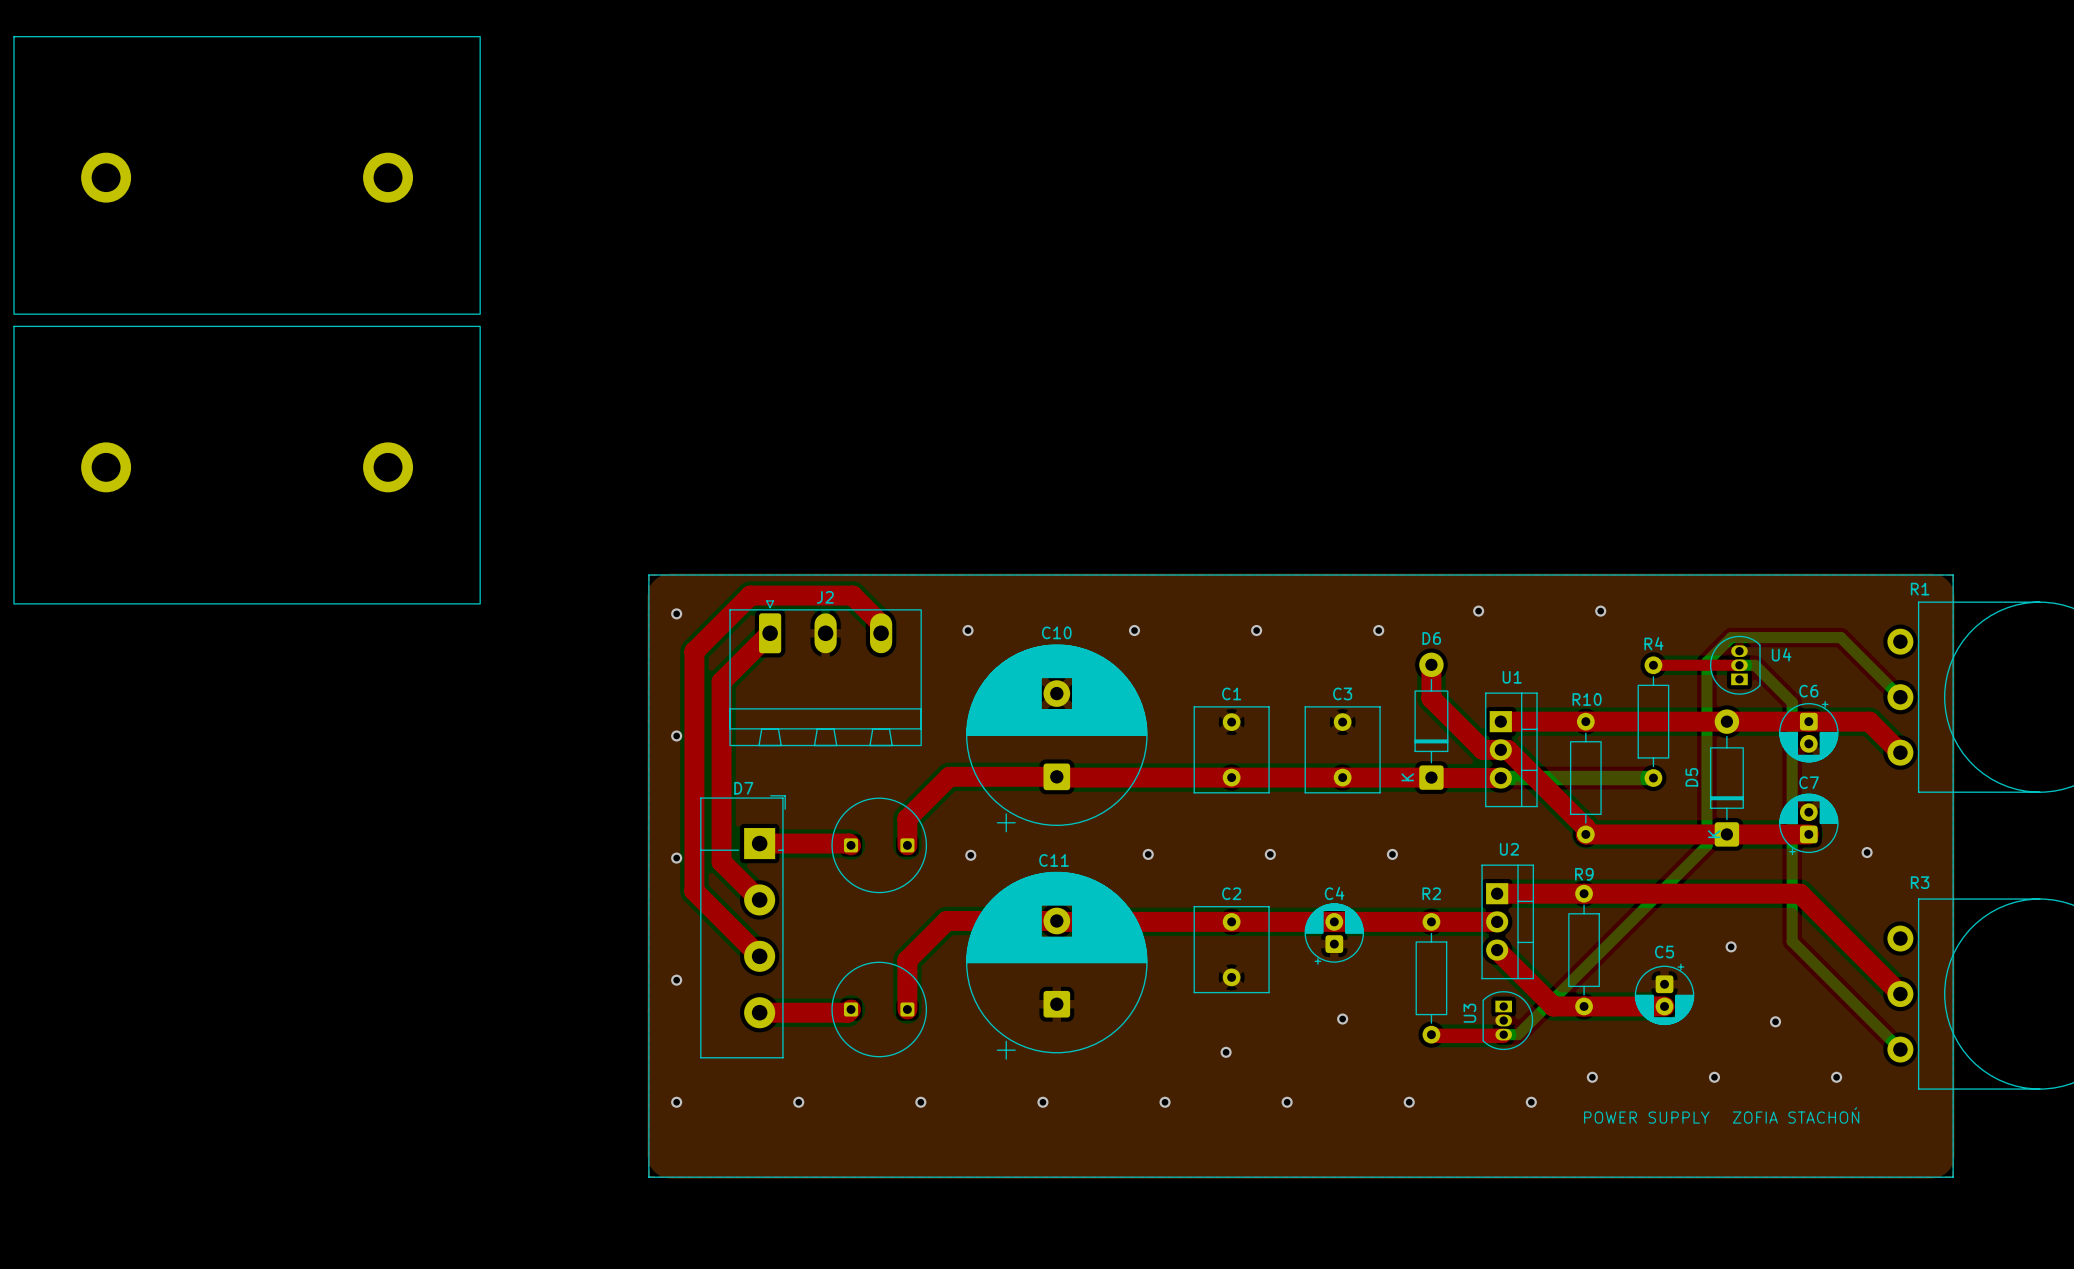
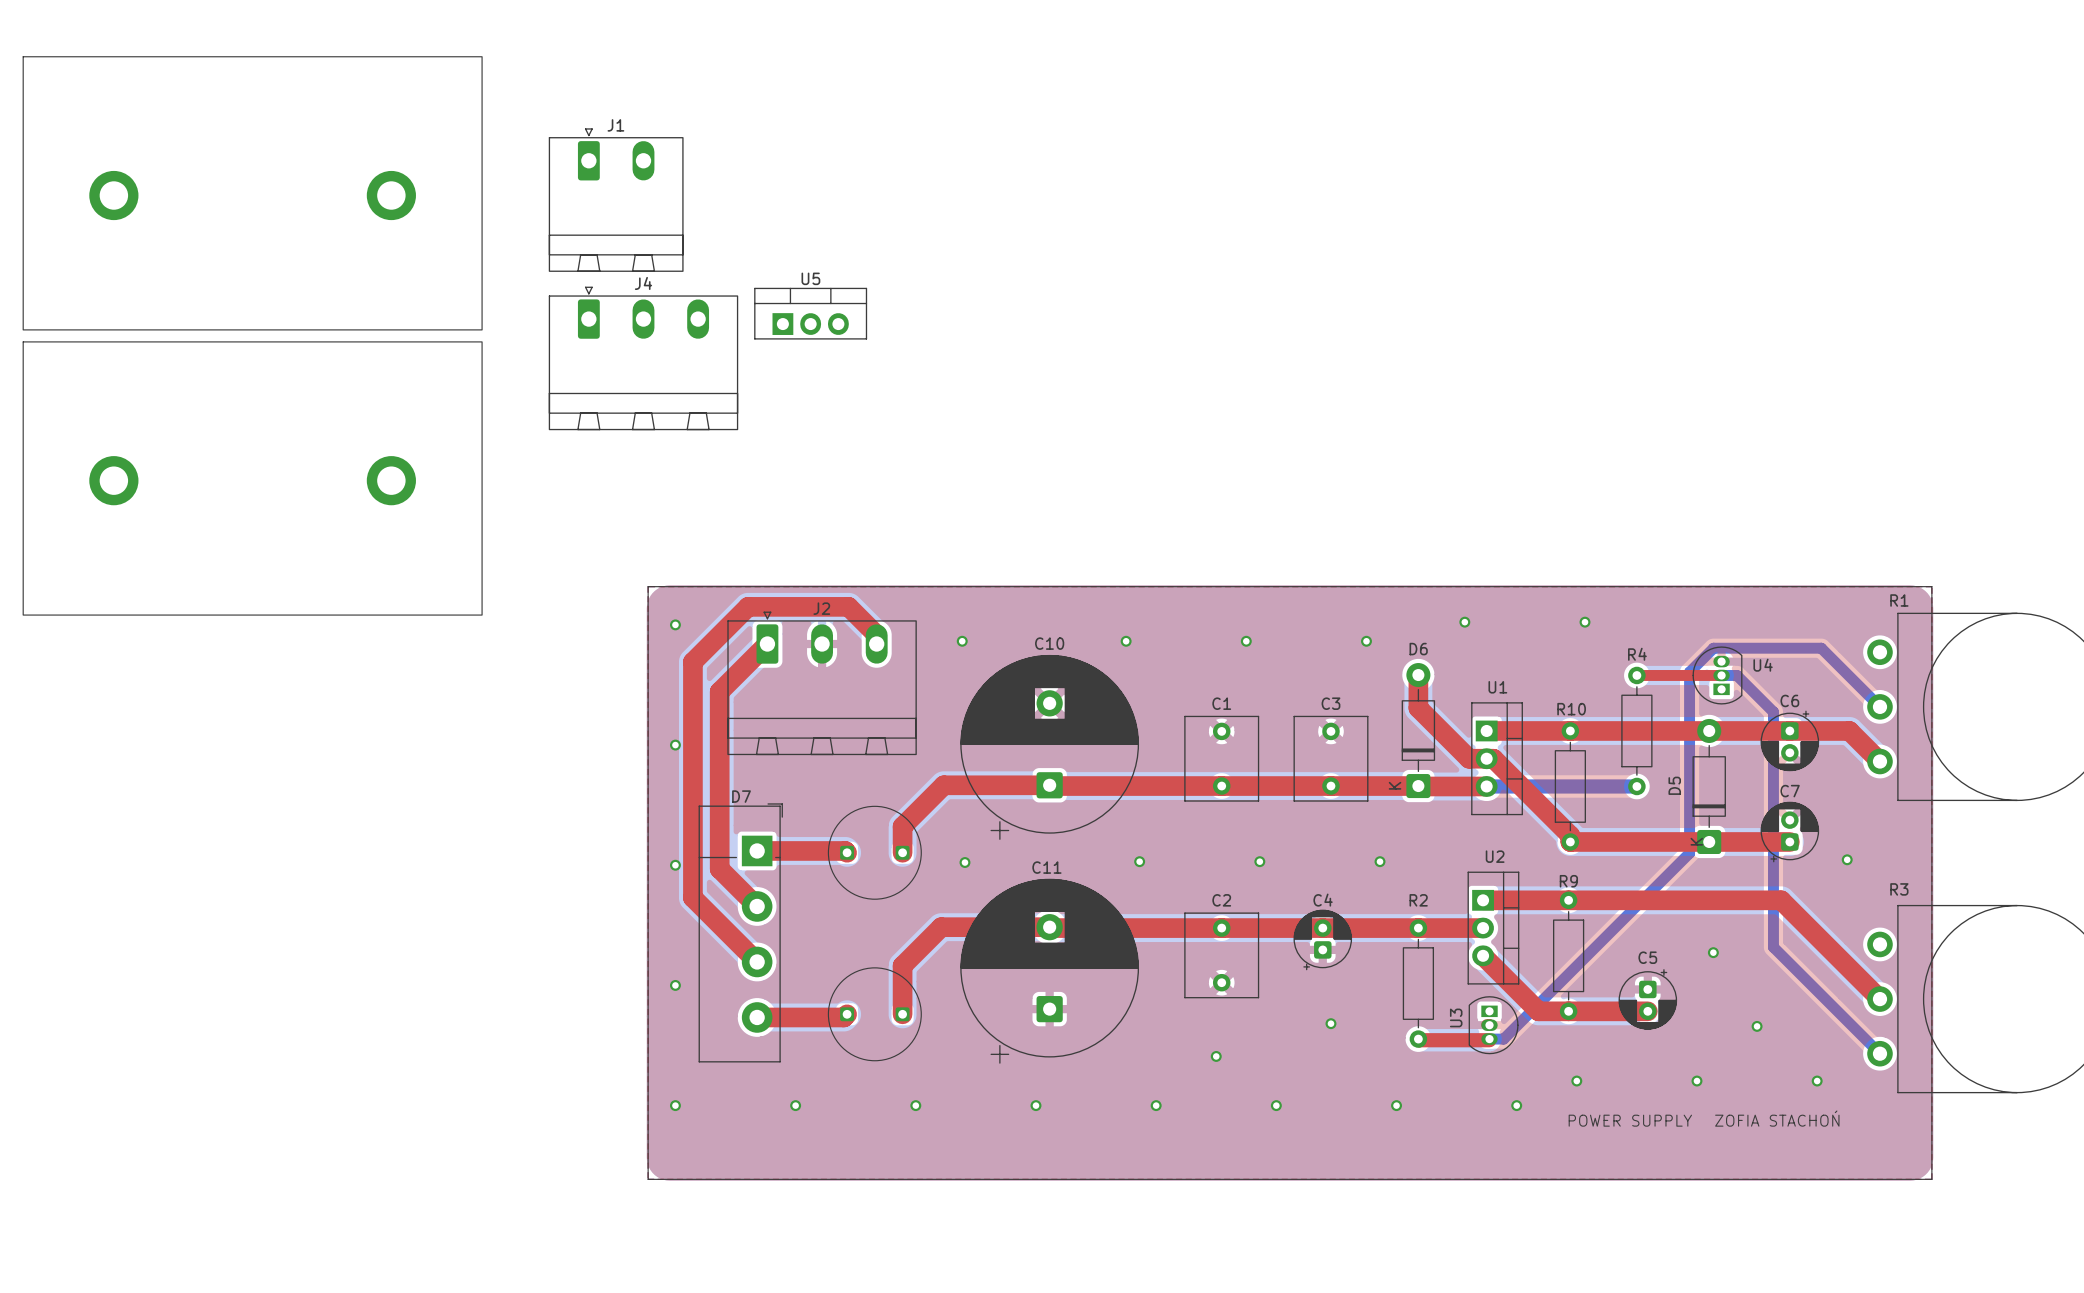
J1: none -> (616, 200)
U5: none -> (810, 313)
J4: none -> (643, 358)

